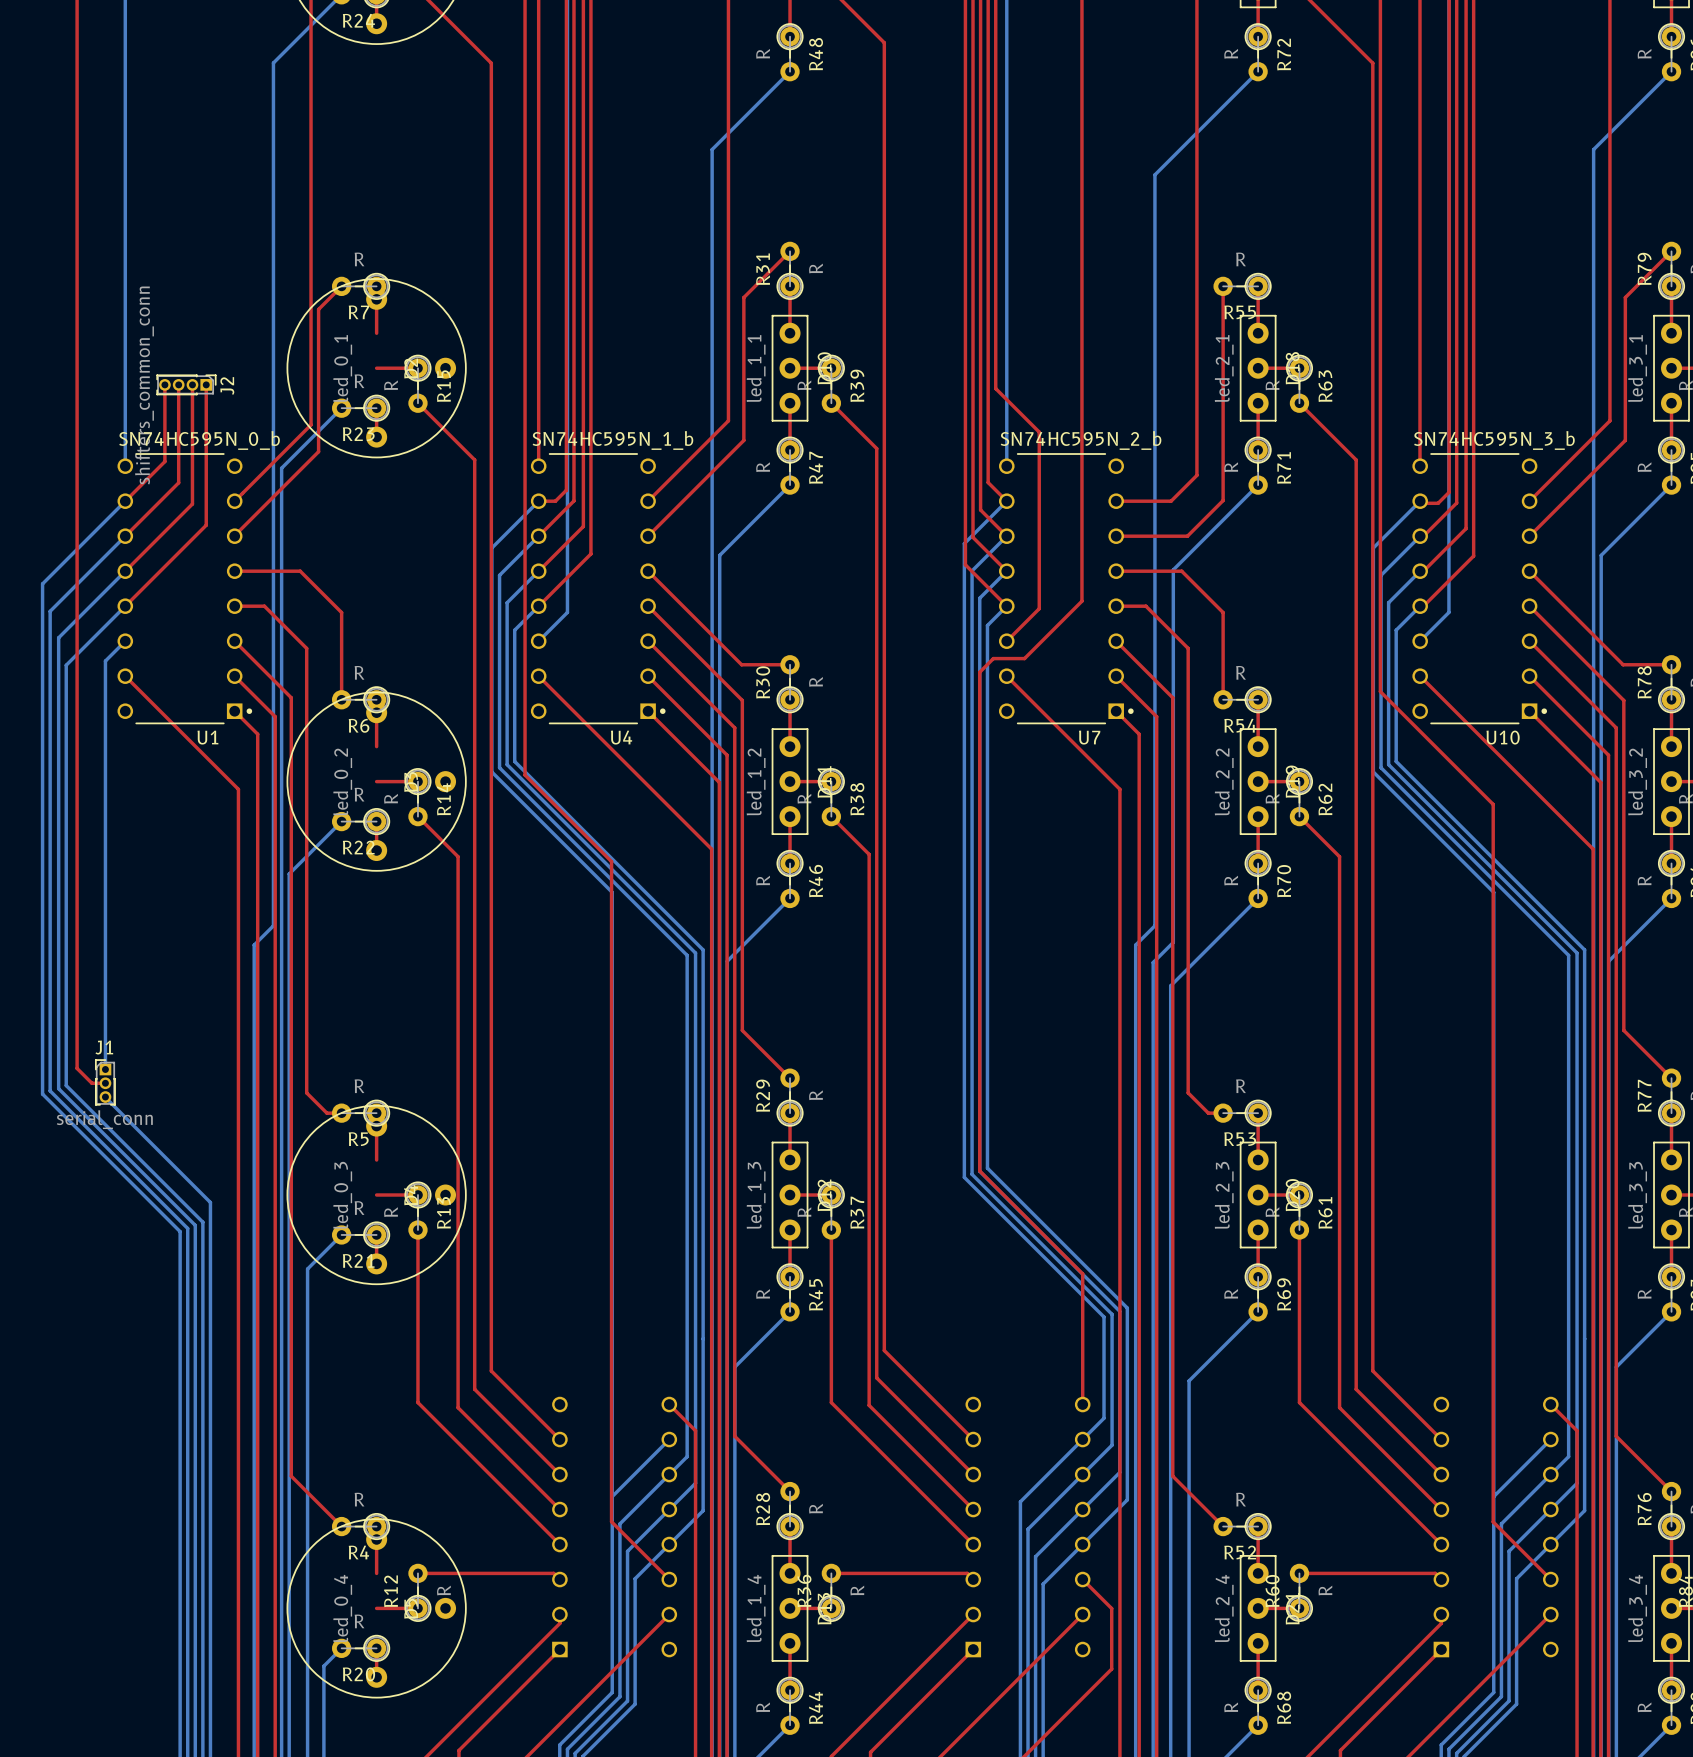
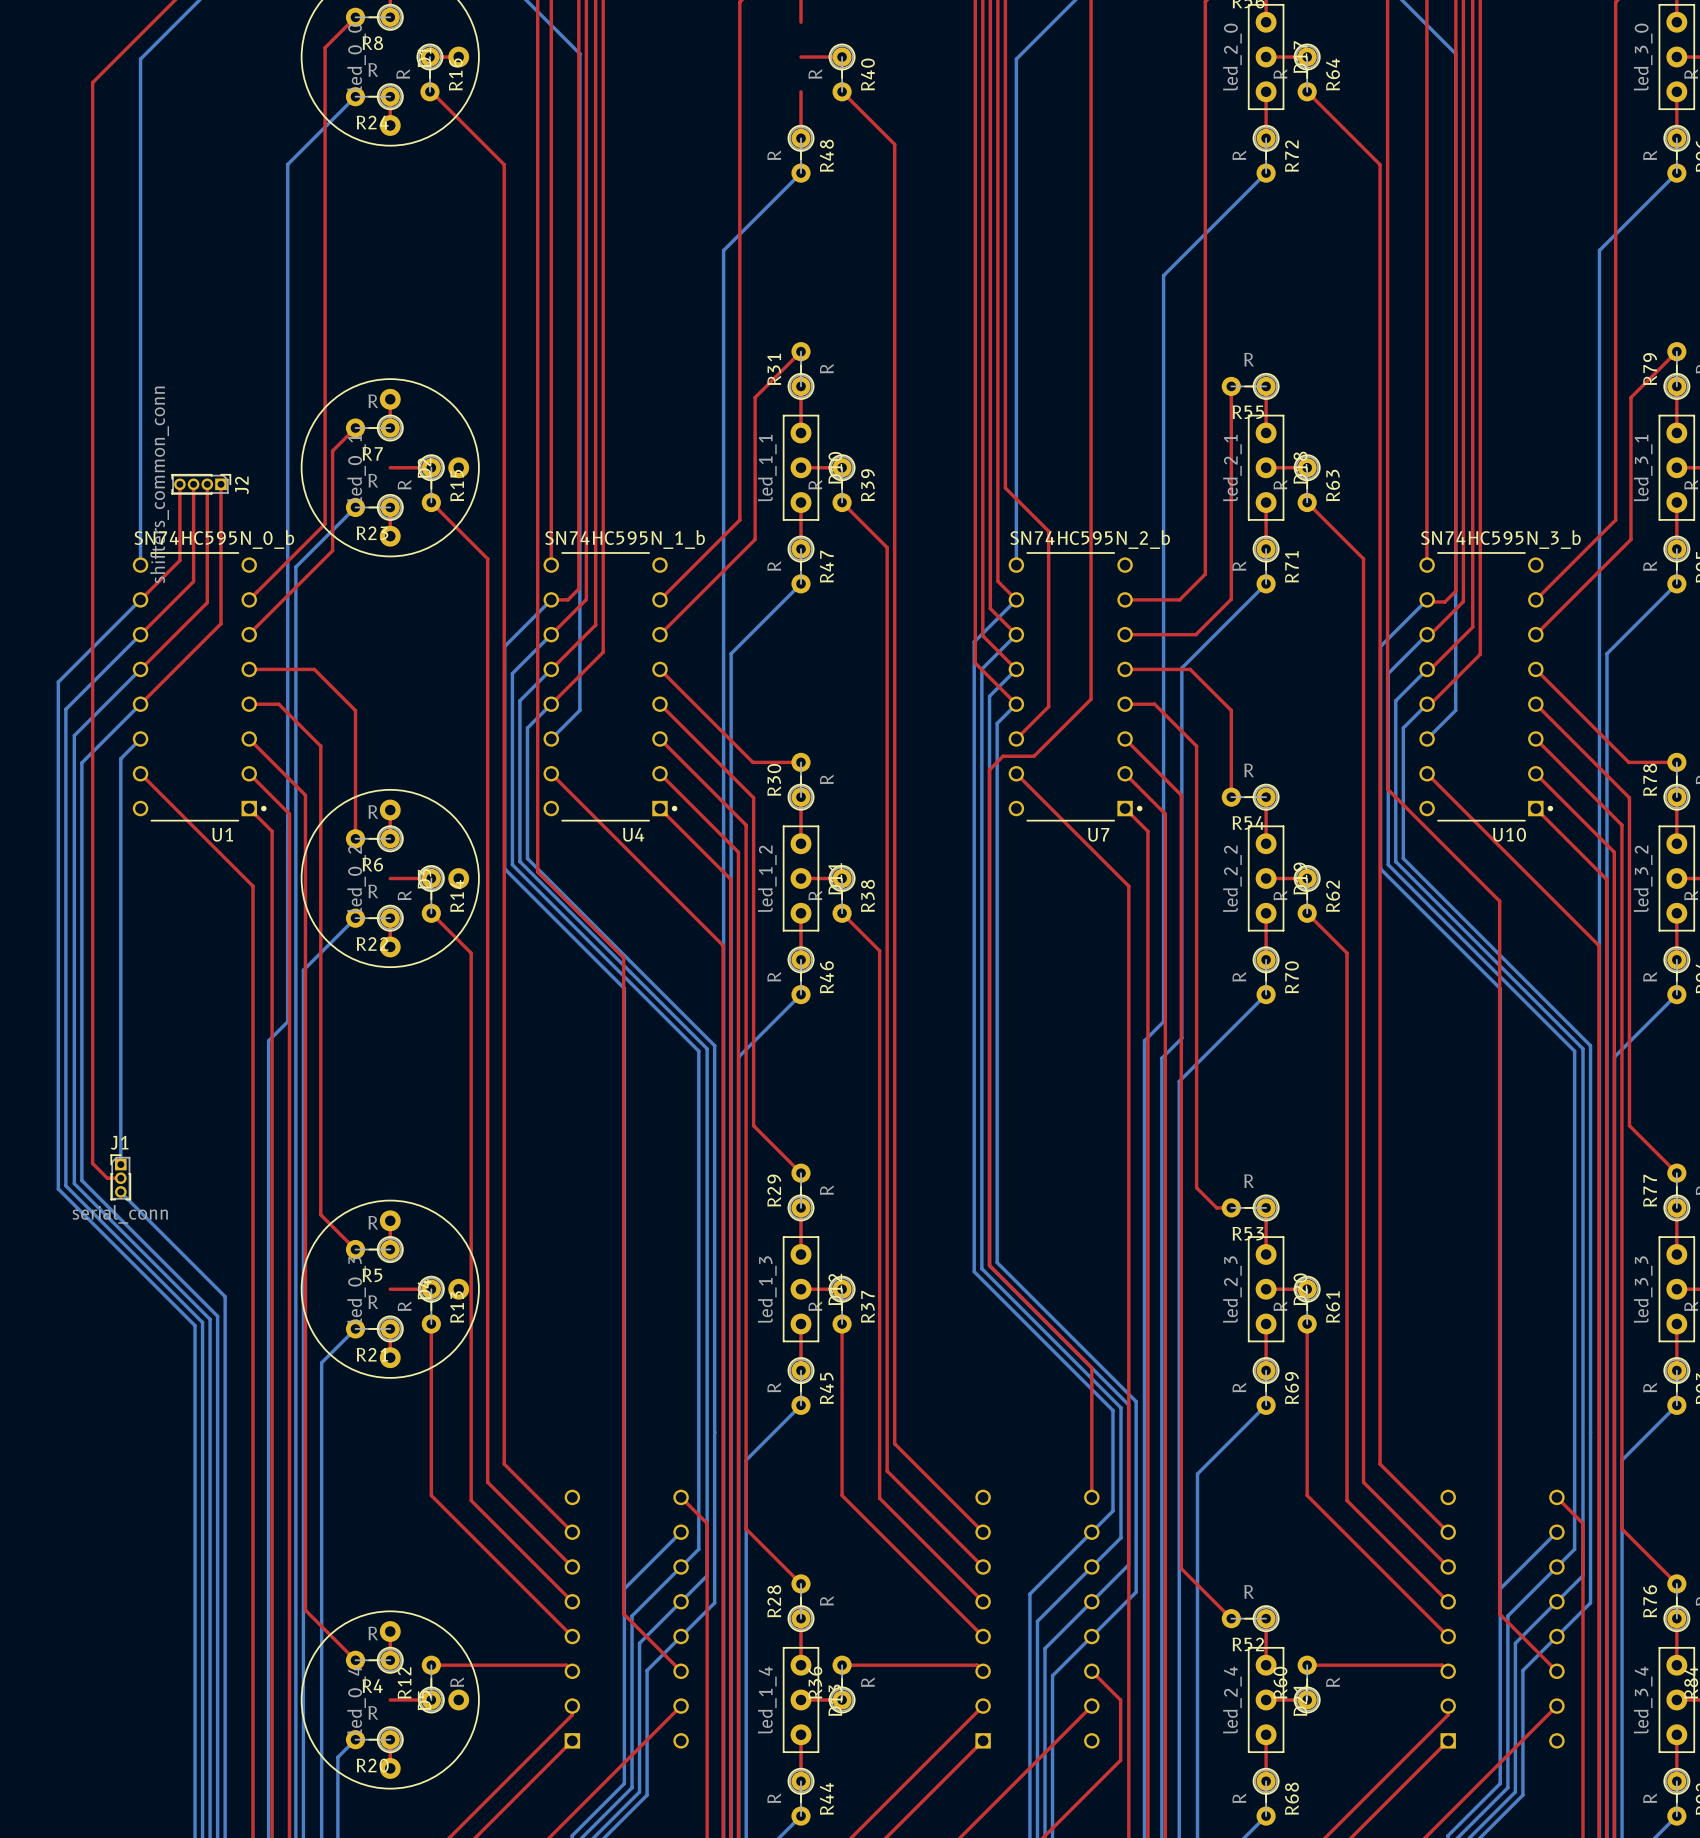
top track: (341, 286) (318, 309) (318, 351) -> (355, 428) (332, 450)
R7 position: (361, 286) -> (374, 428)
top track: none -> (355, 797) (355, 838)
R6 position: (361, 699) -> (374, 838)
top track: (306, 1092) (326, 1113) (341, 1113) -> (320, 1187) (320, 1214) (355, 1249)
R5 position: (361, 1113) -> (374, 1249)
top track: (291, 1476) (341, 1526) -> (305, 1568) (305, 1610) (355, 1660)
R4 position: (361, 1526) -> (374, 1660)

